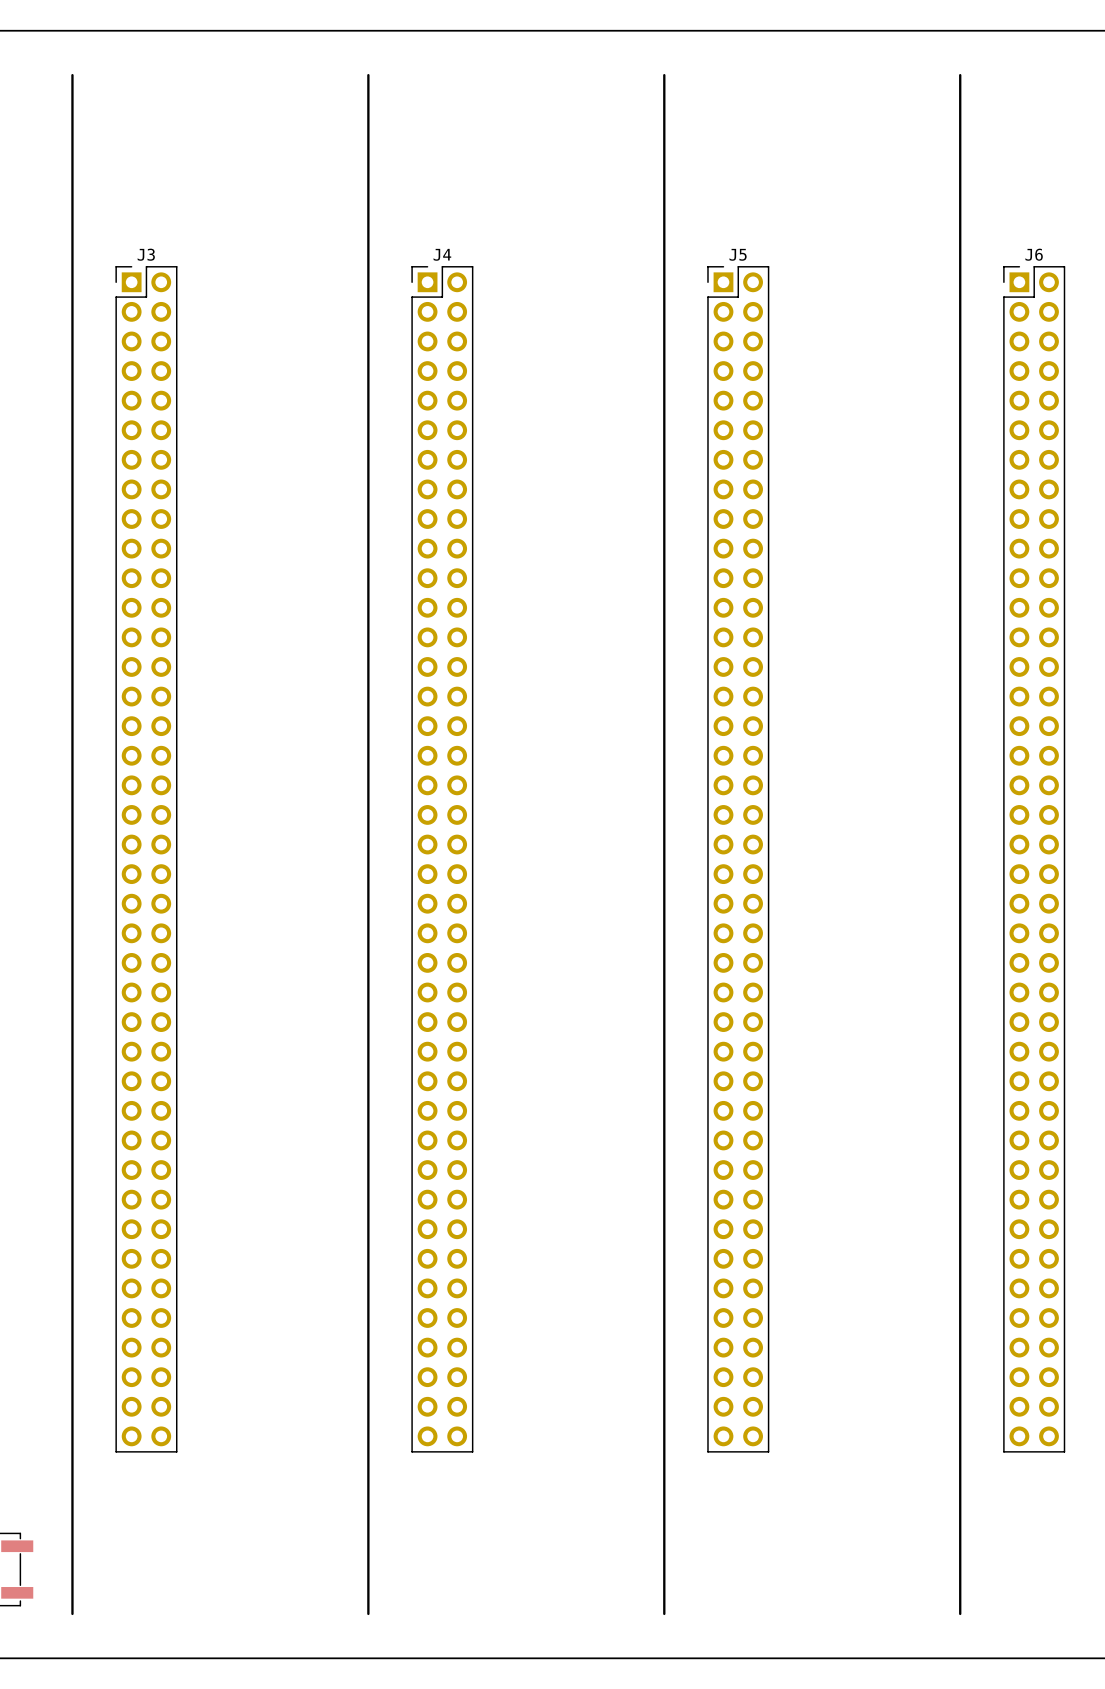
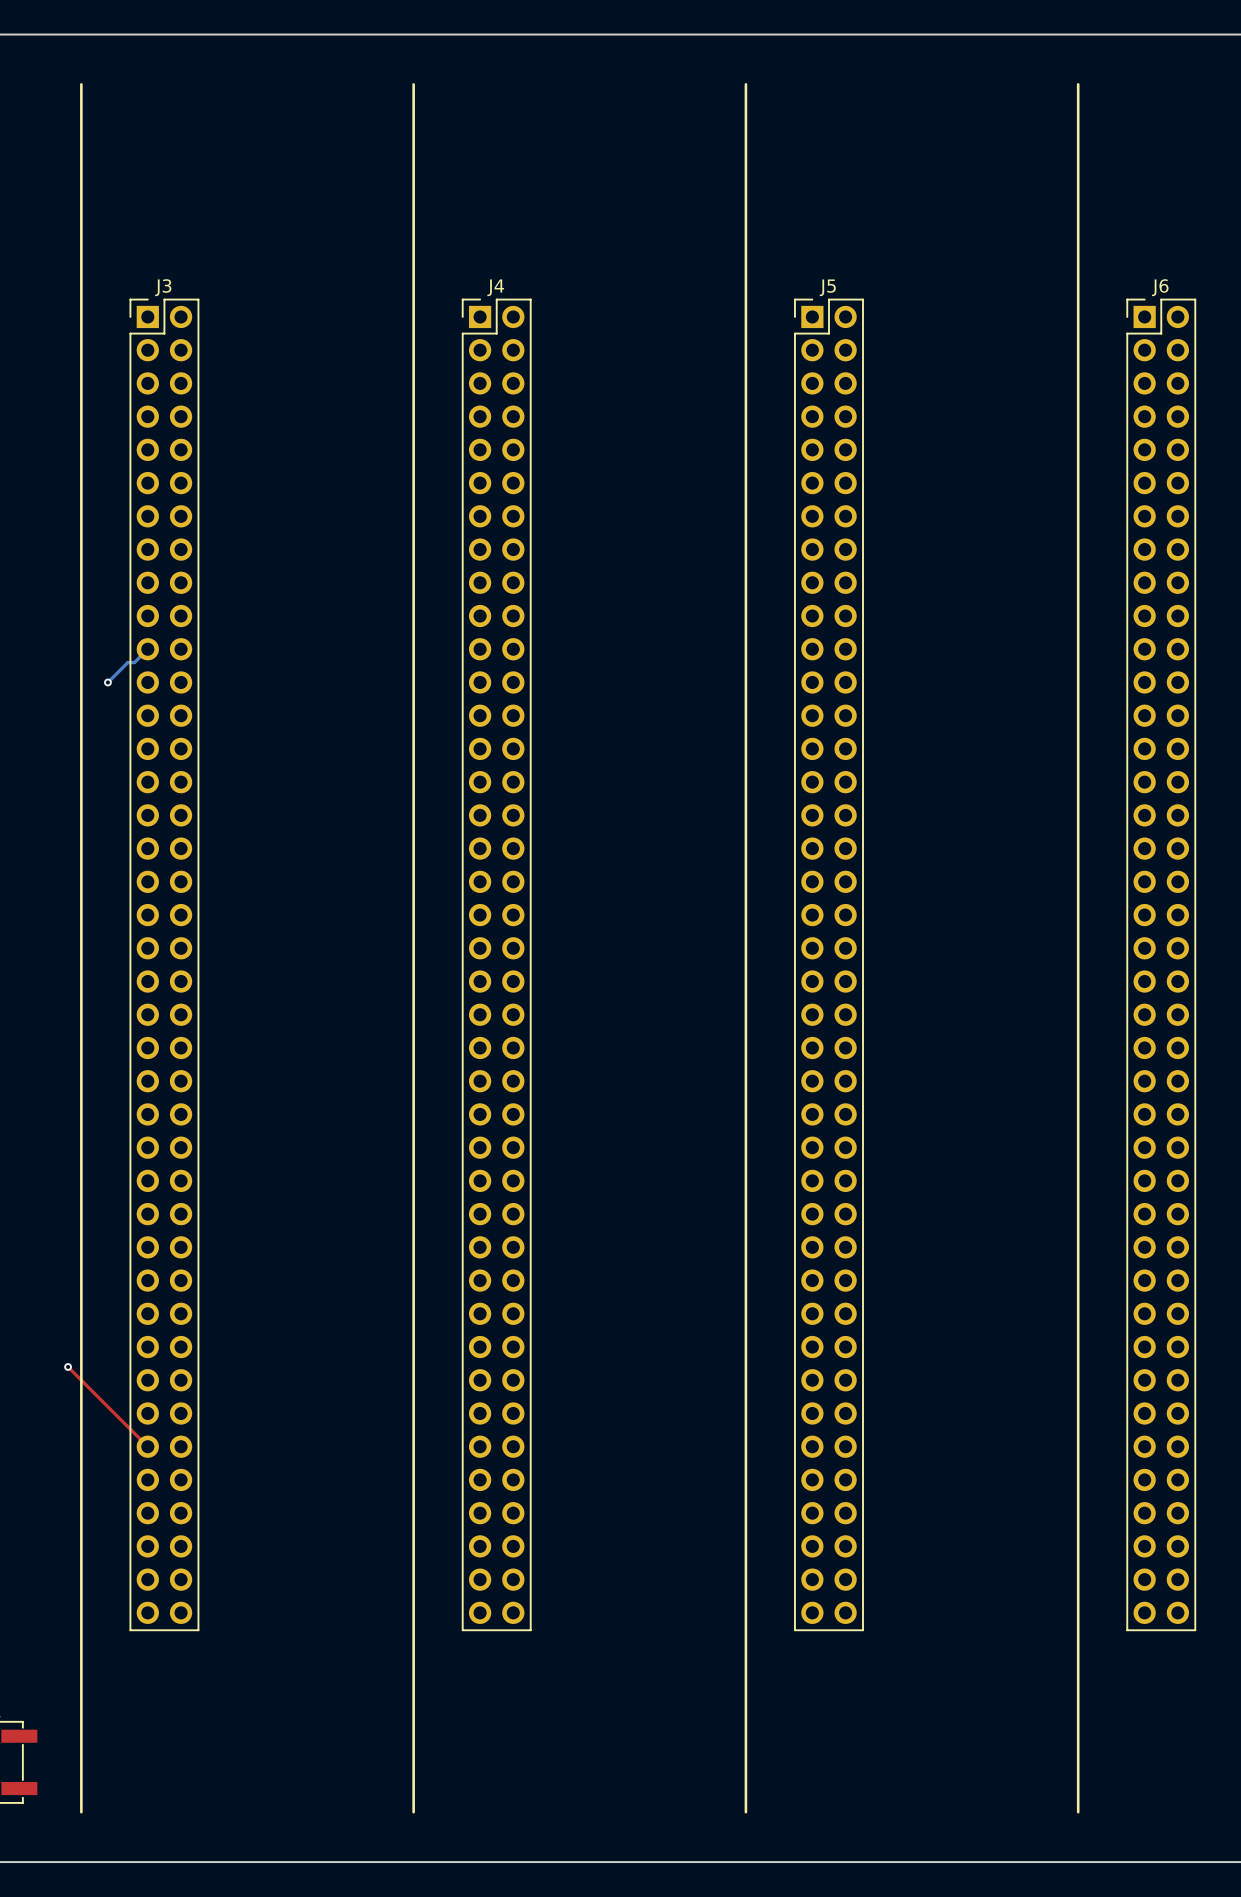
bottom track: none -> (147, 649) (134, 662) (127, 662) (107, 682)
via: none -> (107, 682)
top track: none -> (68, 1366) (147, 1446)
via: none -> (68, 1366)

